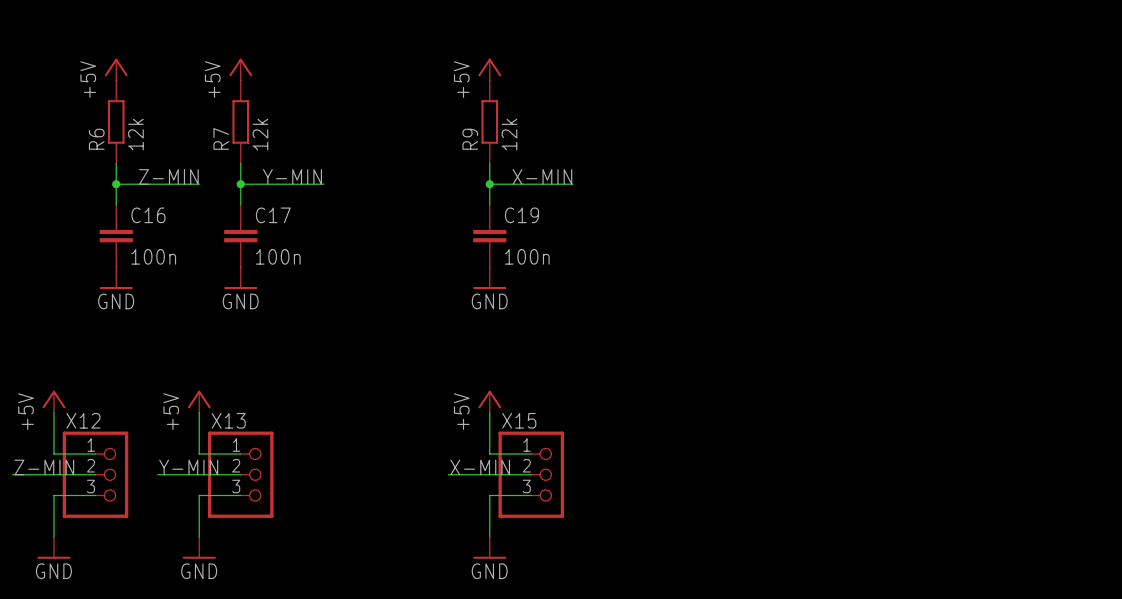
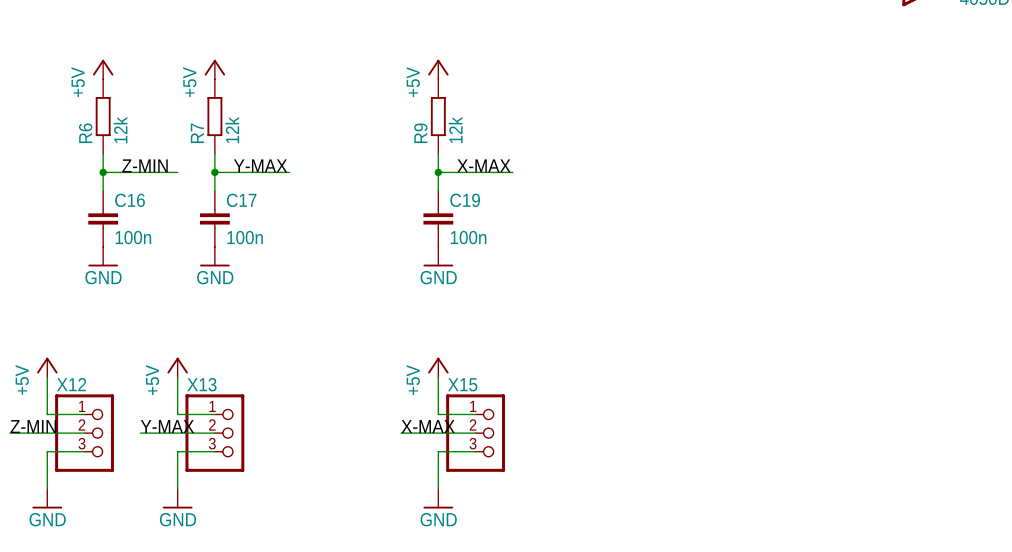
label: Y-MIN (292, 176) -> Y-MAX (260, 165)
label: X-MIN (542, 176) -> X-MAX (483, 165)
label: Y-MIN (188, 467) -> Y-MAX (167, 426)
label: X-MIN (480, 467) -> X-MAX (428, 426)

